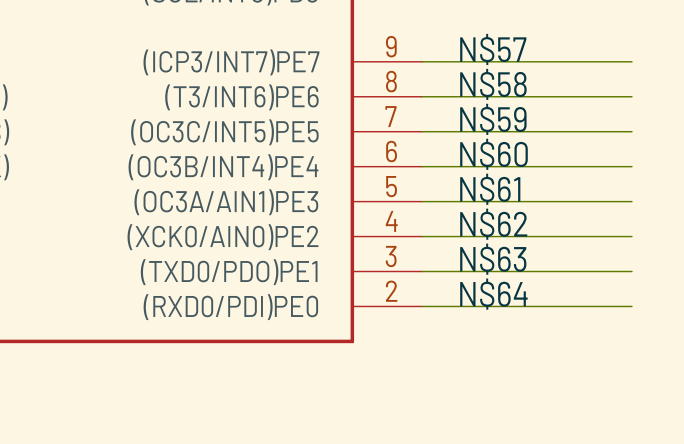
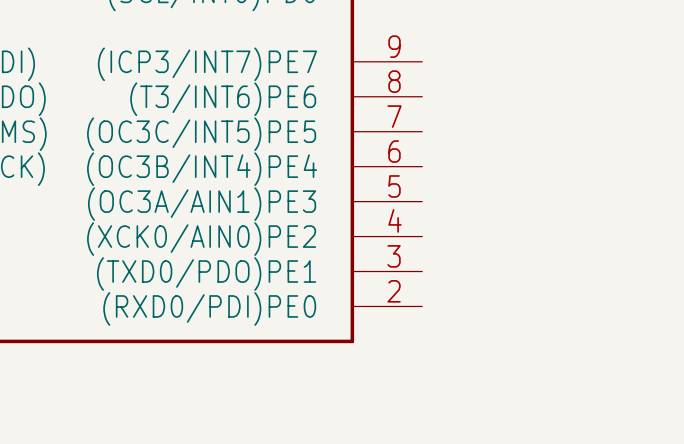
label: N$57 (493, 49) -> none
wire: (422, 61) (631, 61) -> none
label: N$58 (493, 84) -> none
wire: (422, 96) (631, 96) -> none
label: N$59 (493, 119) -> none
wire: (422, 131) (631, 131) -> none
label: N$60 (493, 154) -> none
wire: (422, 166) (631, 166) -> none
label: N$61 (490, 189) -> none
wire: (422, 201) (631, 201) -> none
label: N$62 (493, 224) -> none
wire: (422, 236) (631, 236) -> none
label: N$63 (493, 259) -> none
wire: (422, 271) (631, 271) -> none
label: N$64 (493, 294) -> none
wire: (422, 306) (631, 306) -> none

